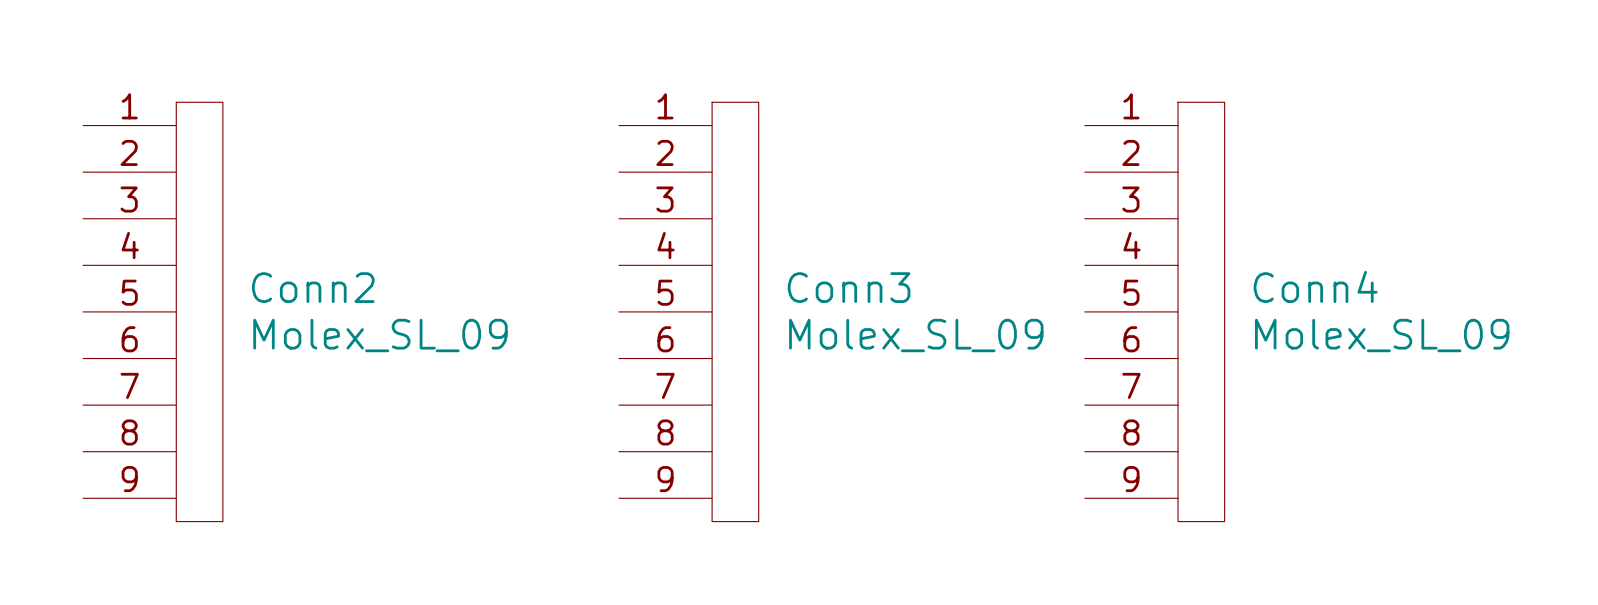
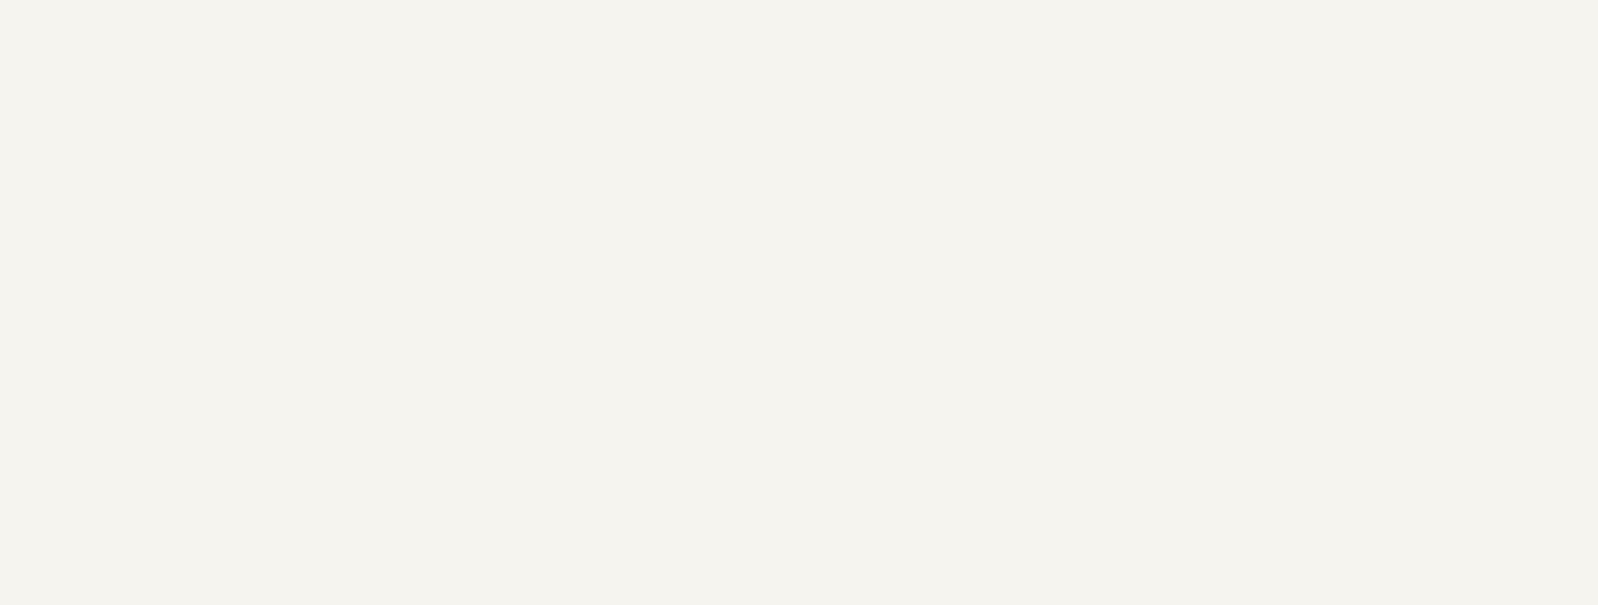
Conn2: Molex_SL_09 (152, 311) -> none
Conn3: Molex_SL_09 (688, 311) -> none
Conn4: Molex_SL_09 (1154, 311) -> none

